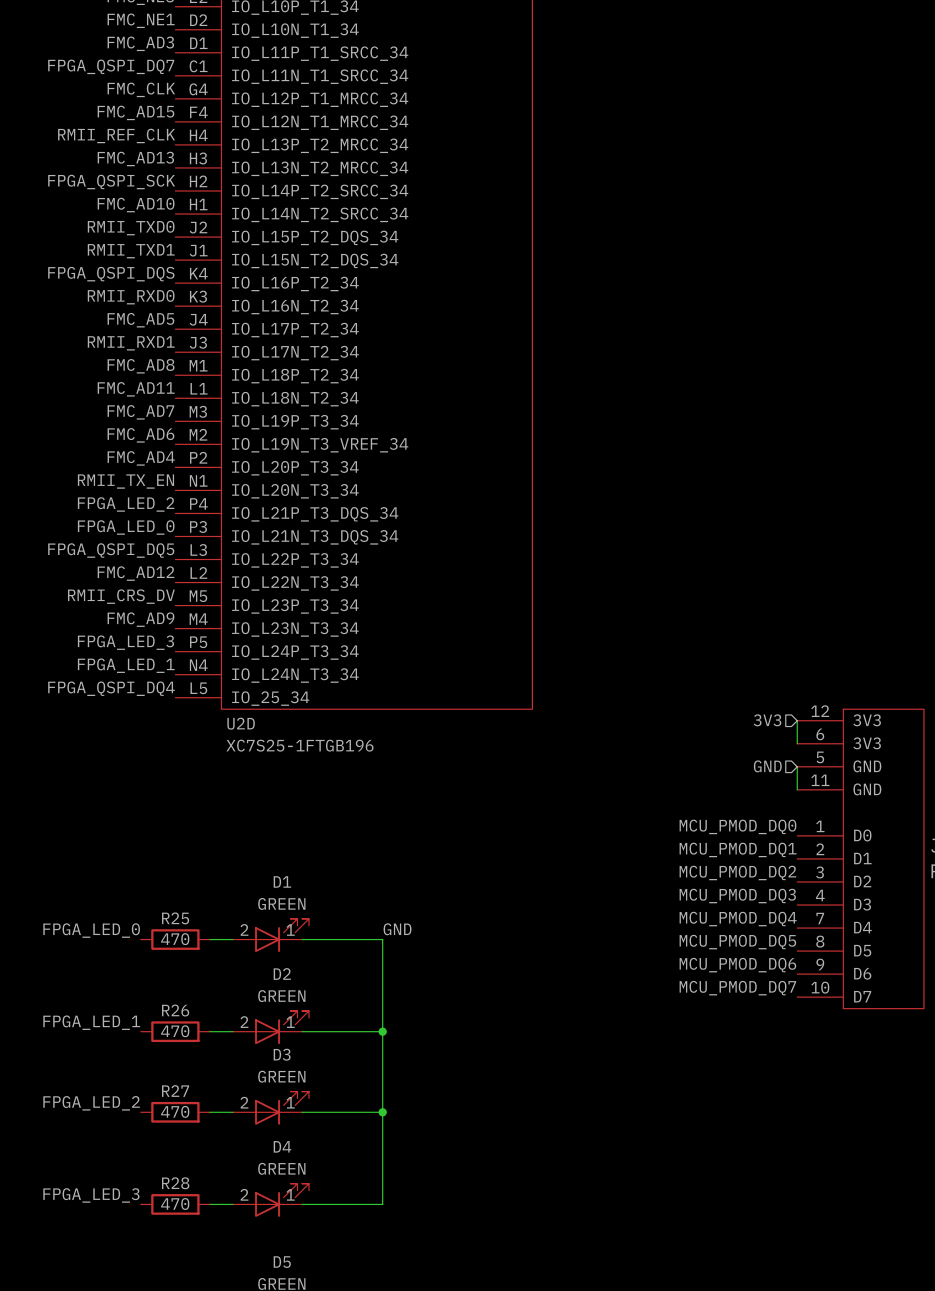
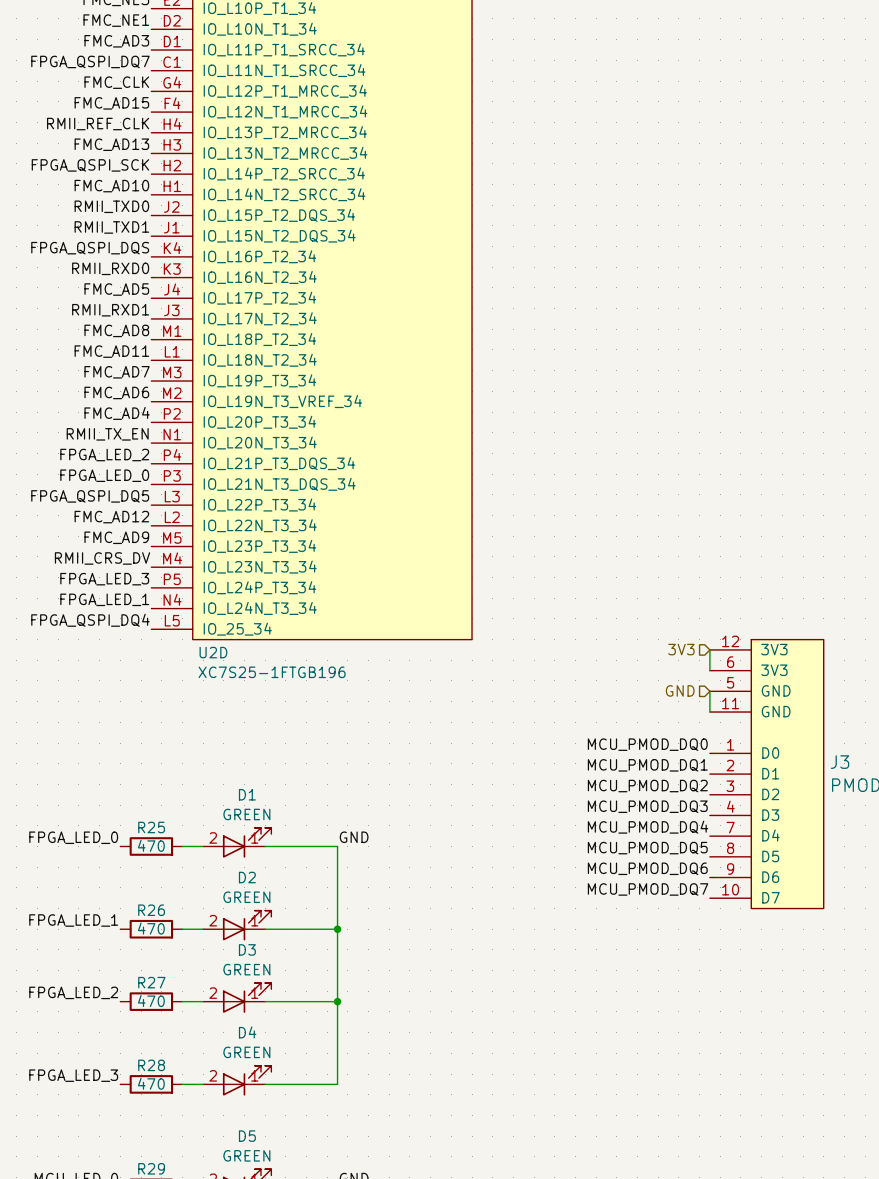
label: RMII_CRS_DV (121, 596) -> FMC_AD9 (116, 537)
label: FMC_AD9 (140, 619) -> RMII_CRS_DV (102, 558)

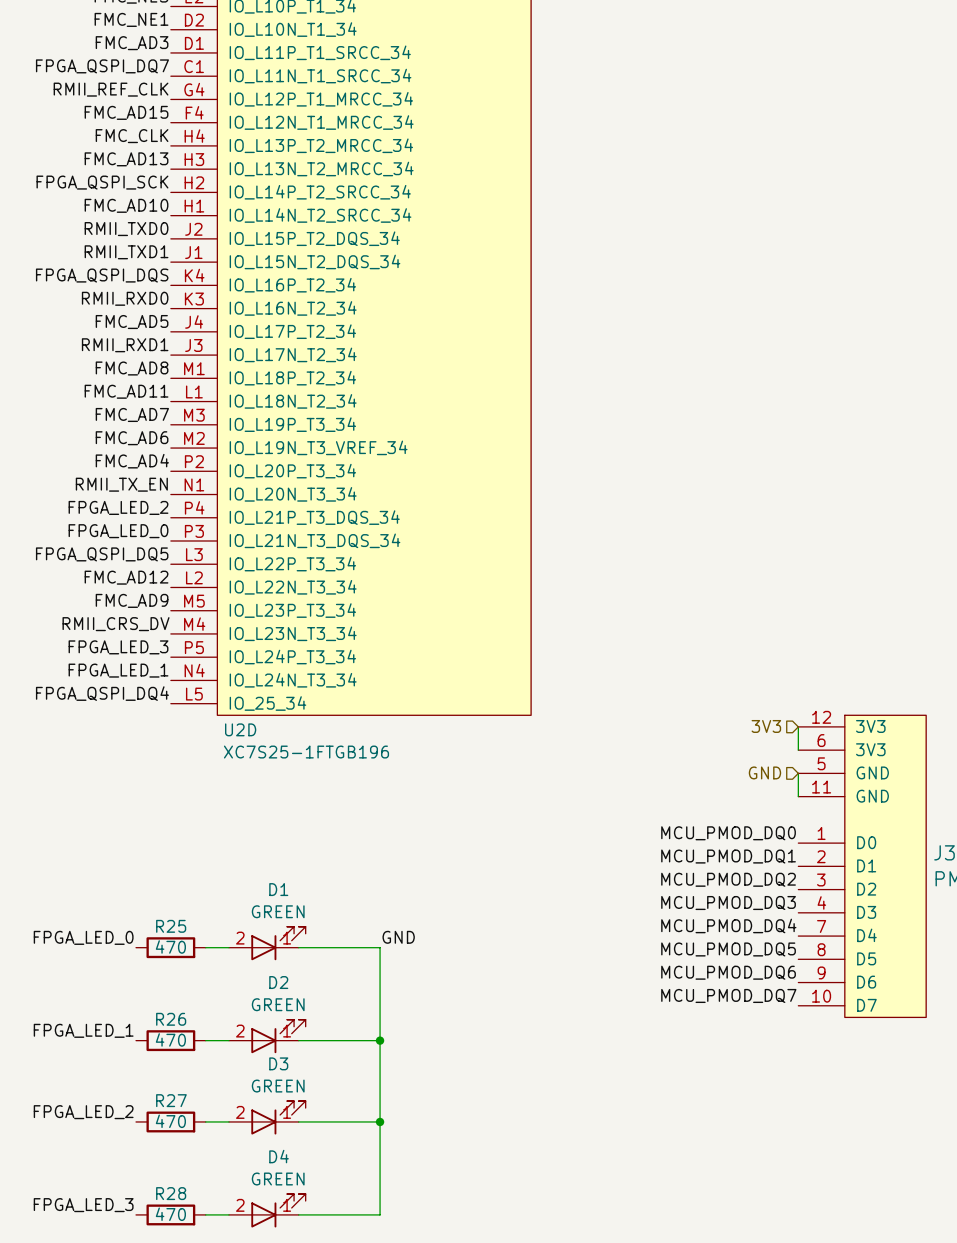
label: FMC_CLK (116, 82) -> RMII_REF_CLK (111, 89)
label: RMII_REF_CLK (98, 124) -> FMC_CLK (132, 136)

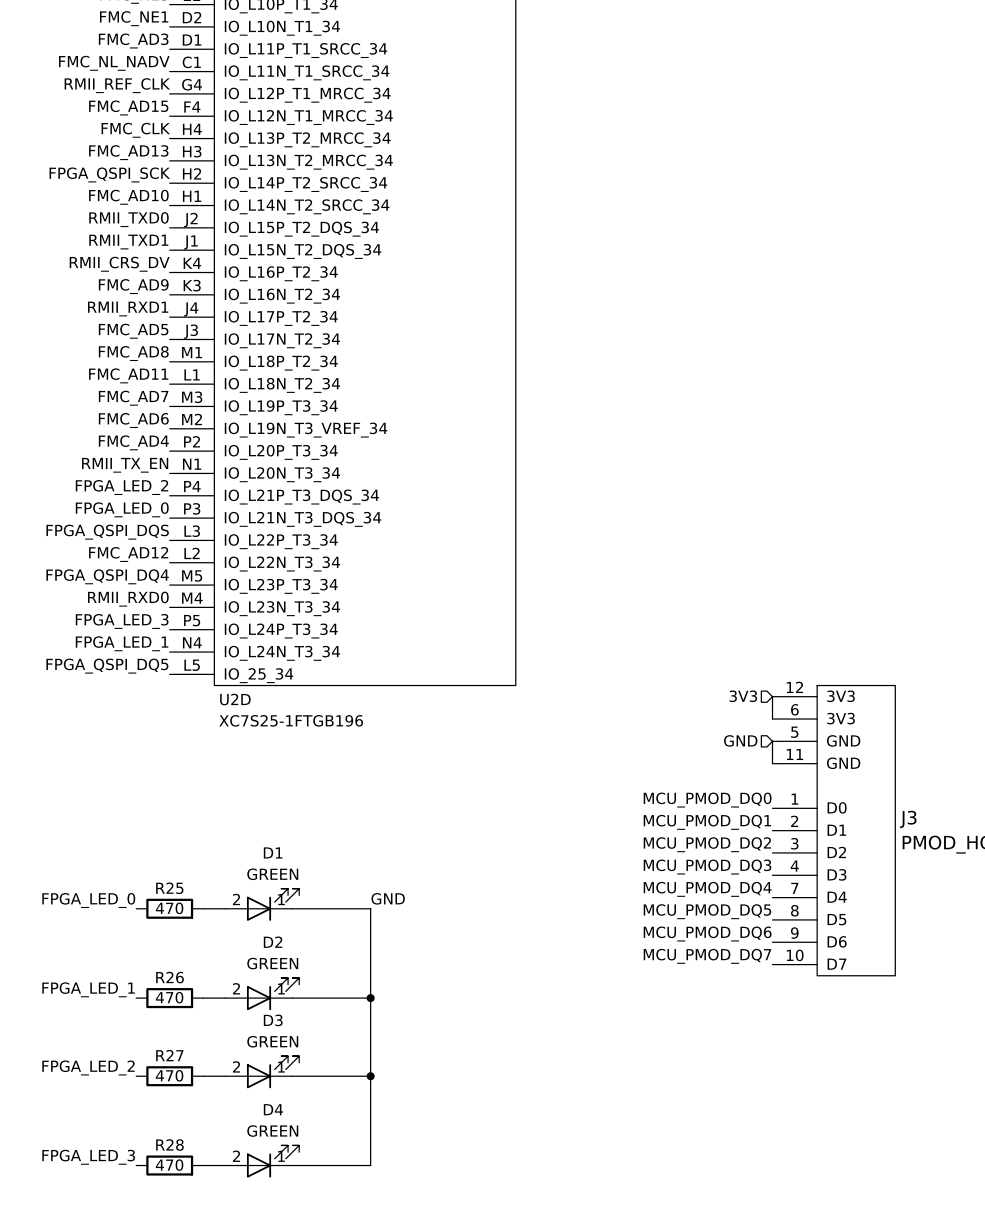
label: FPGA_QSPI_DQ7 (102, 66) -> FMC_NL_NADV (114, 63)
label: FPGA_QSPI_DQS (102, 275) -> RMII_CRS_DV (119, 264)
label: RMII_RXD0 (125, 298) -> FMC_AD9 (133, 286)
label: FMC_AD5 (132, 322) -> RMII_RXD1 (128, 309)
label: RMII_RXD1 (125, 345) -> FMC_AD5 (133, 331)
label: FPGA_QSPI_DQ5 (102, 554) -> FPGA_QSPI_DQS (107, 532)
label: FMC_AD9 (132, 600) -> FPGA_QSPI_DQ4 (107, 576)
label: RMII_CRS_DV (116, 624) -> RMII_RXD0 (128, 599)
label: FPGA_QSPI_DQ4 (102, 693) -> FPGA_QSPI_DQ5 (107, 666)

